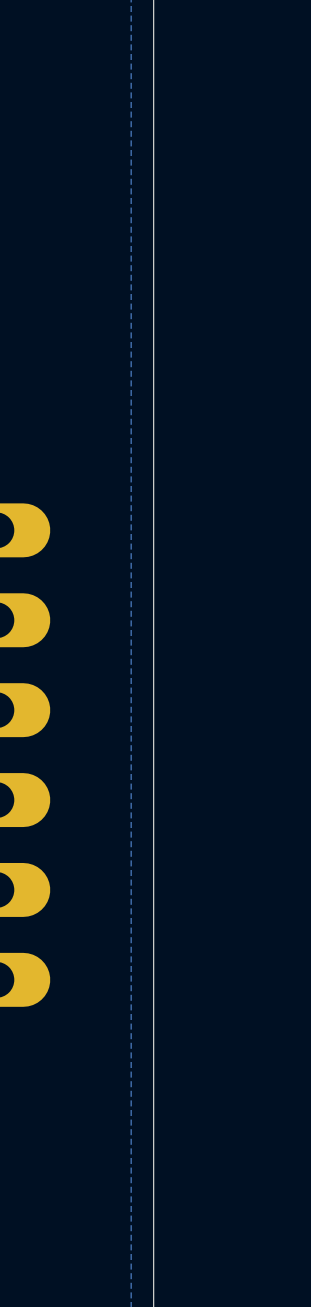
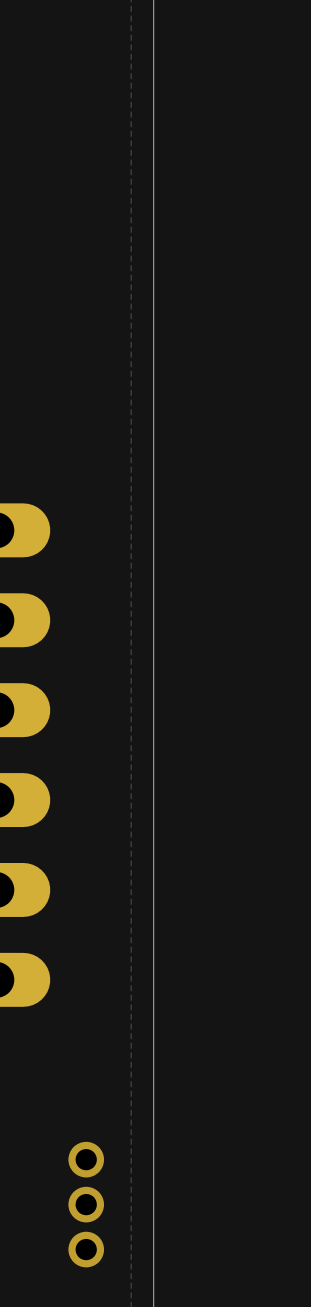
via: none -> (86, 1159)
via: none -> (86, 1204)
via: none -> (86, 1249)

